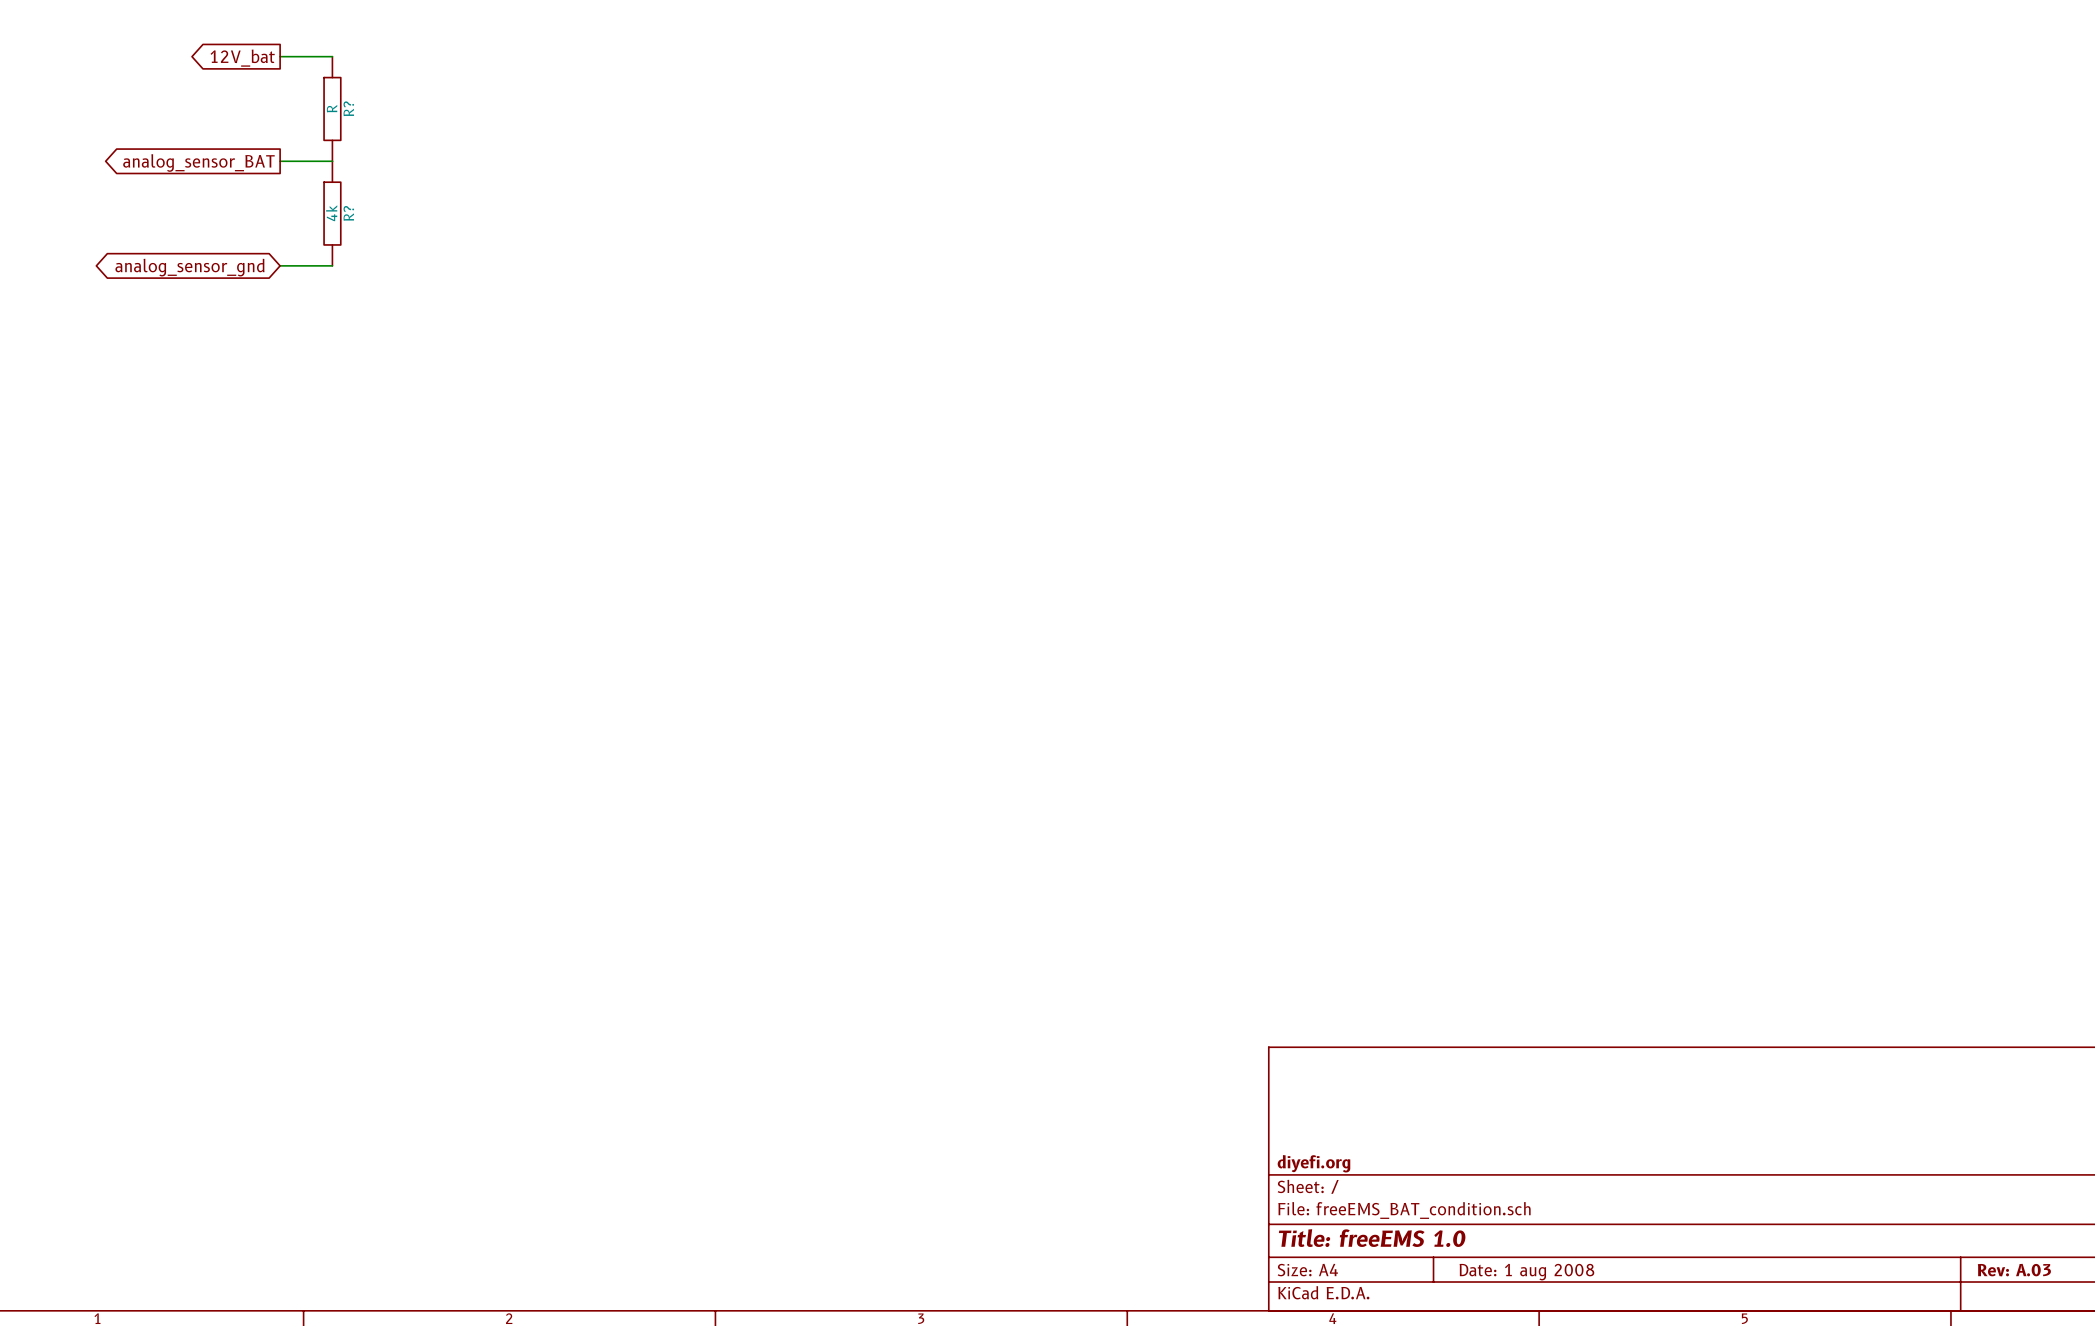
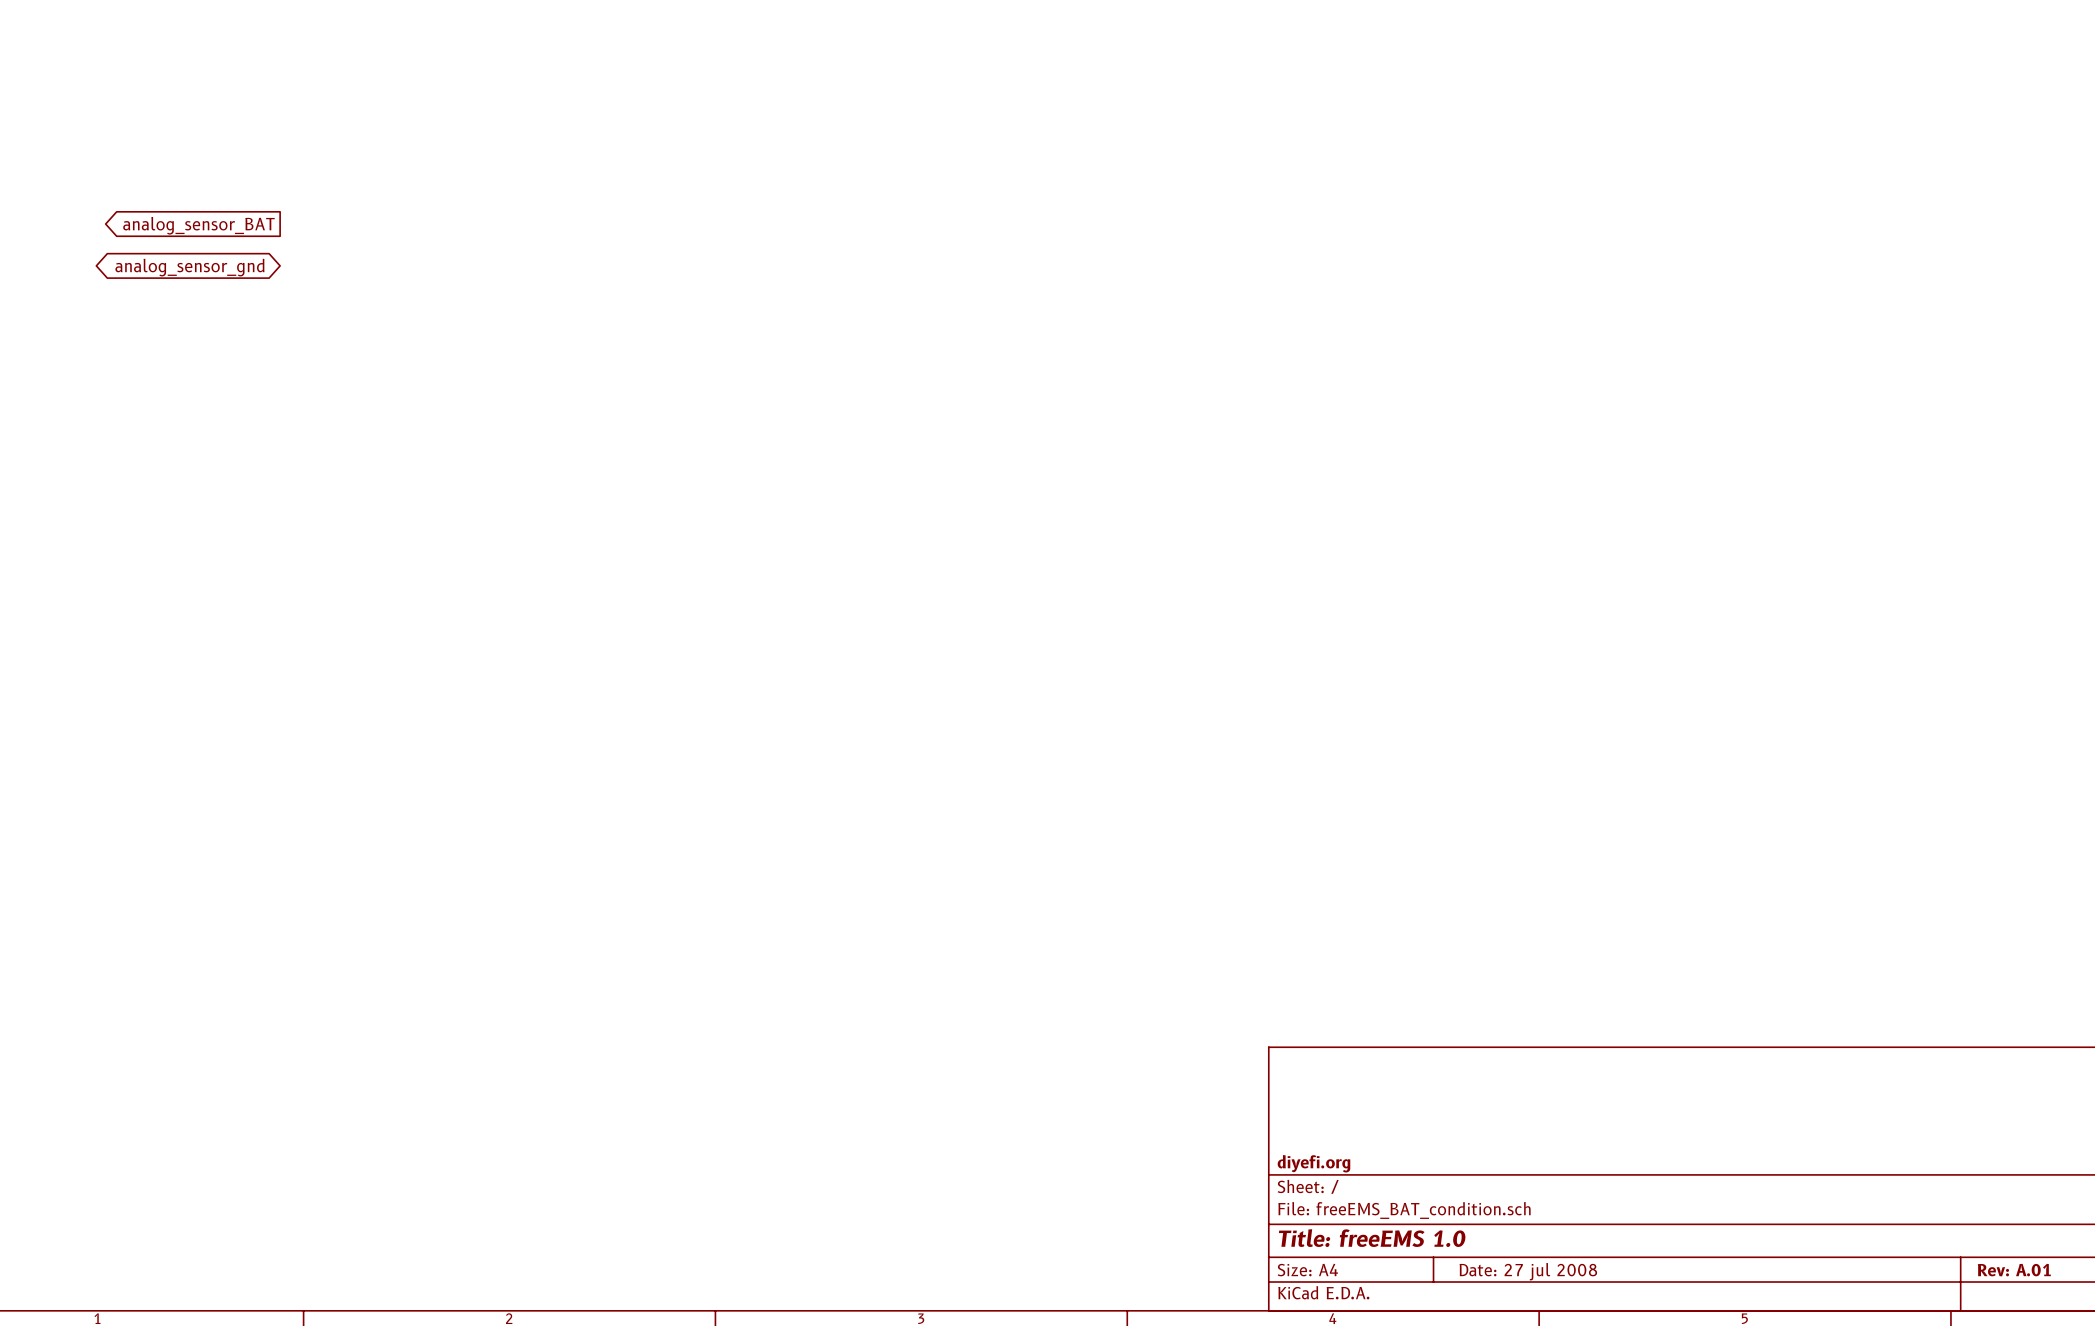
wire: (280, 56) (332, 56) -> none
global label: 12V_bat (242, 58) -> none
R?: R (332, 108) -> none
wire: (280, 161) (332, 161) -> none
global label position: analog_sensor_BAT (198, 162) -> analog_sensor_BAT (198, 225)
R?: 4k (332, 213) -> none
wire: (280, 265) (332, 265) -> none
title block: Rev: A.03 (2014, 1270) -> Rev: A.01 (2014, 1270)
title block: Date: 1 aug 2008 (1526, 1272) -> Date: 27 jul 2008 (1528, 1271)

